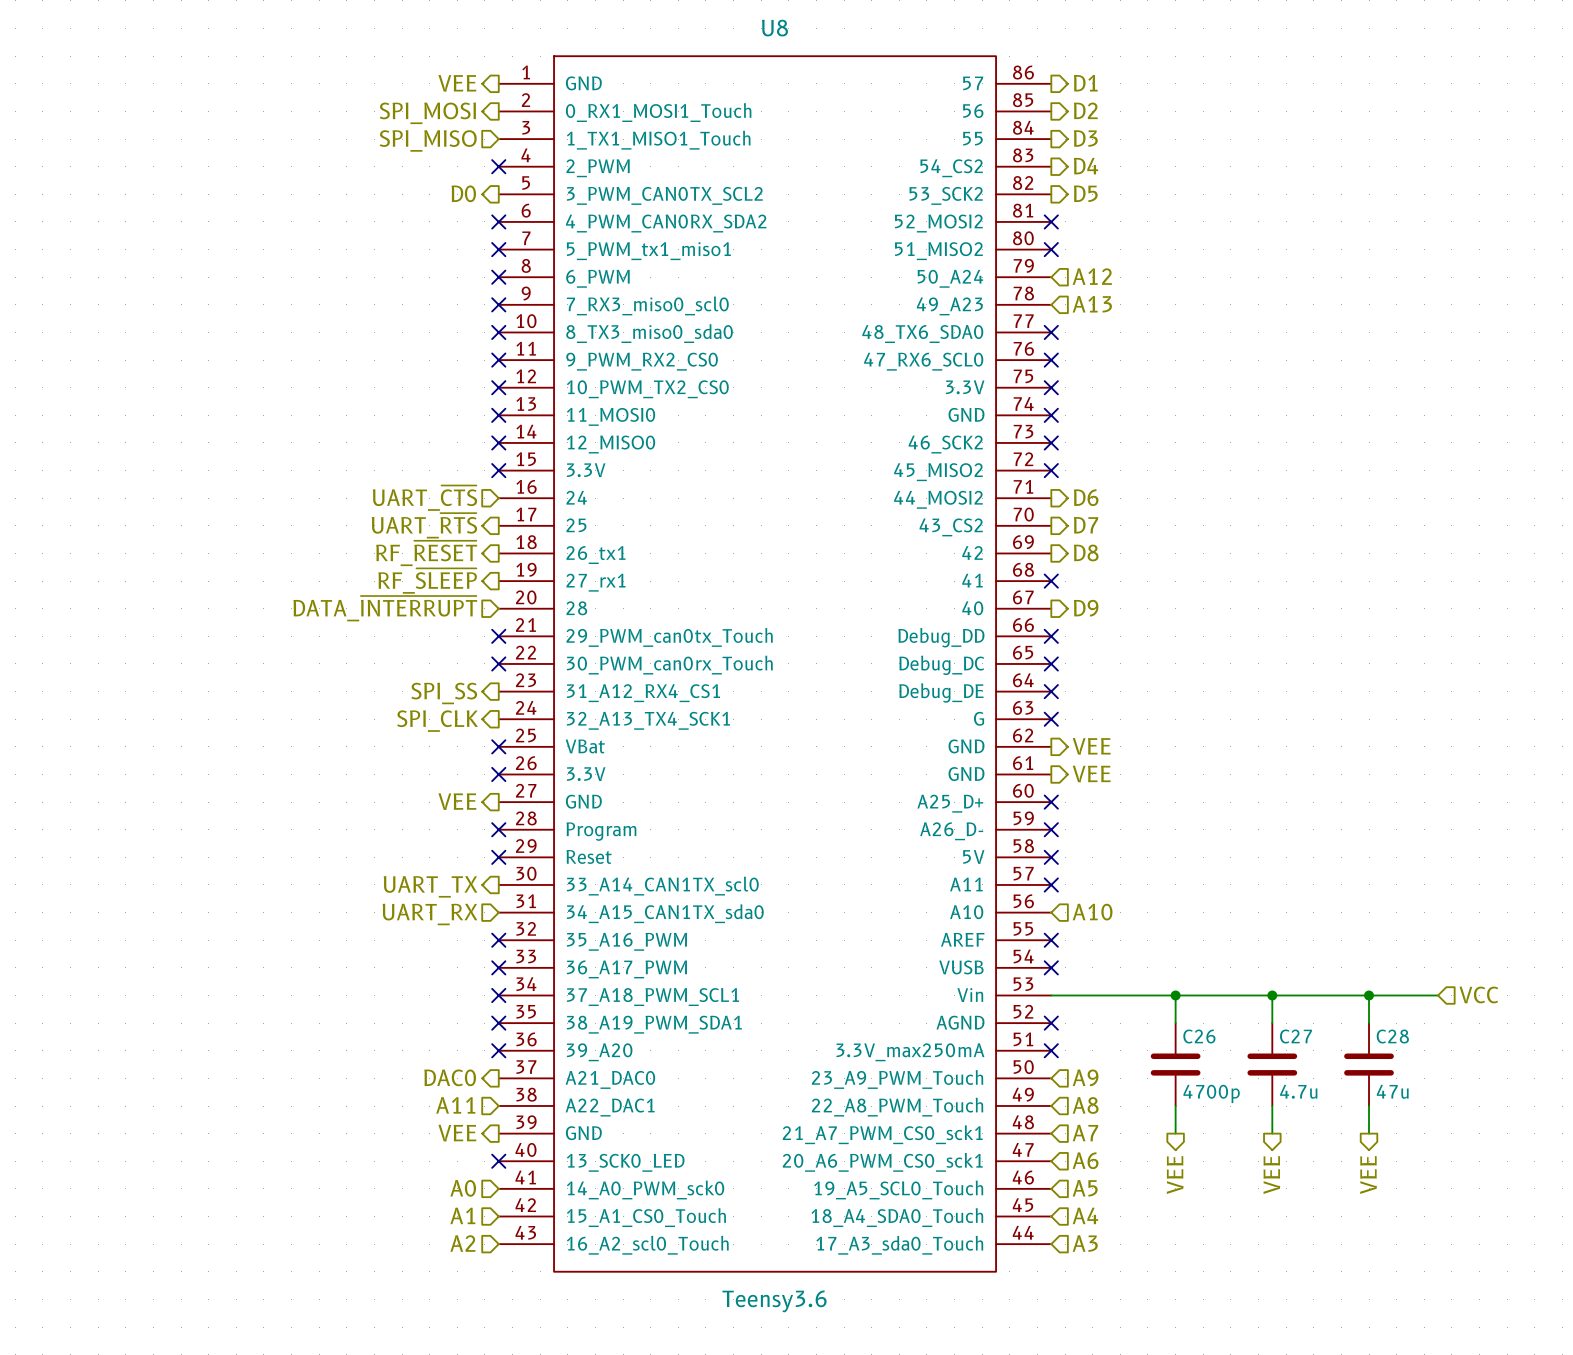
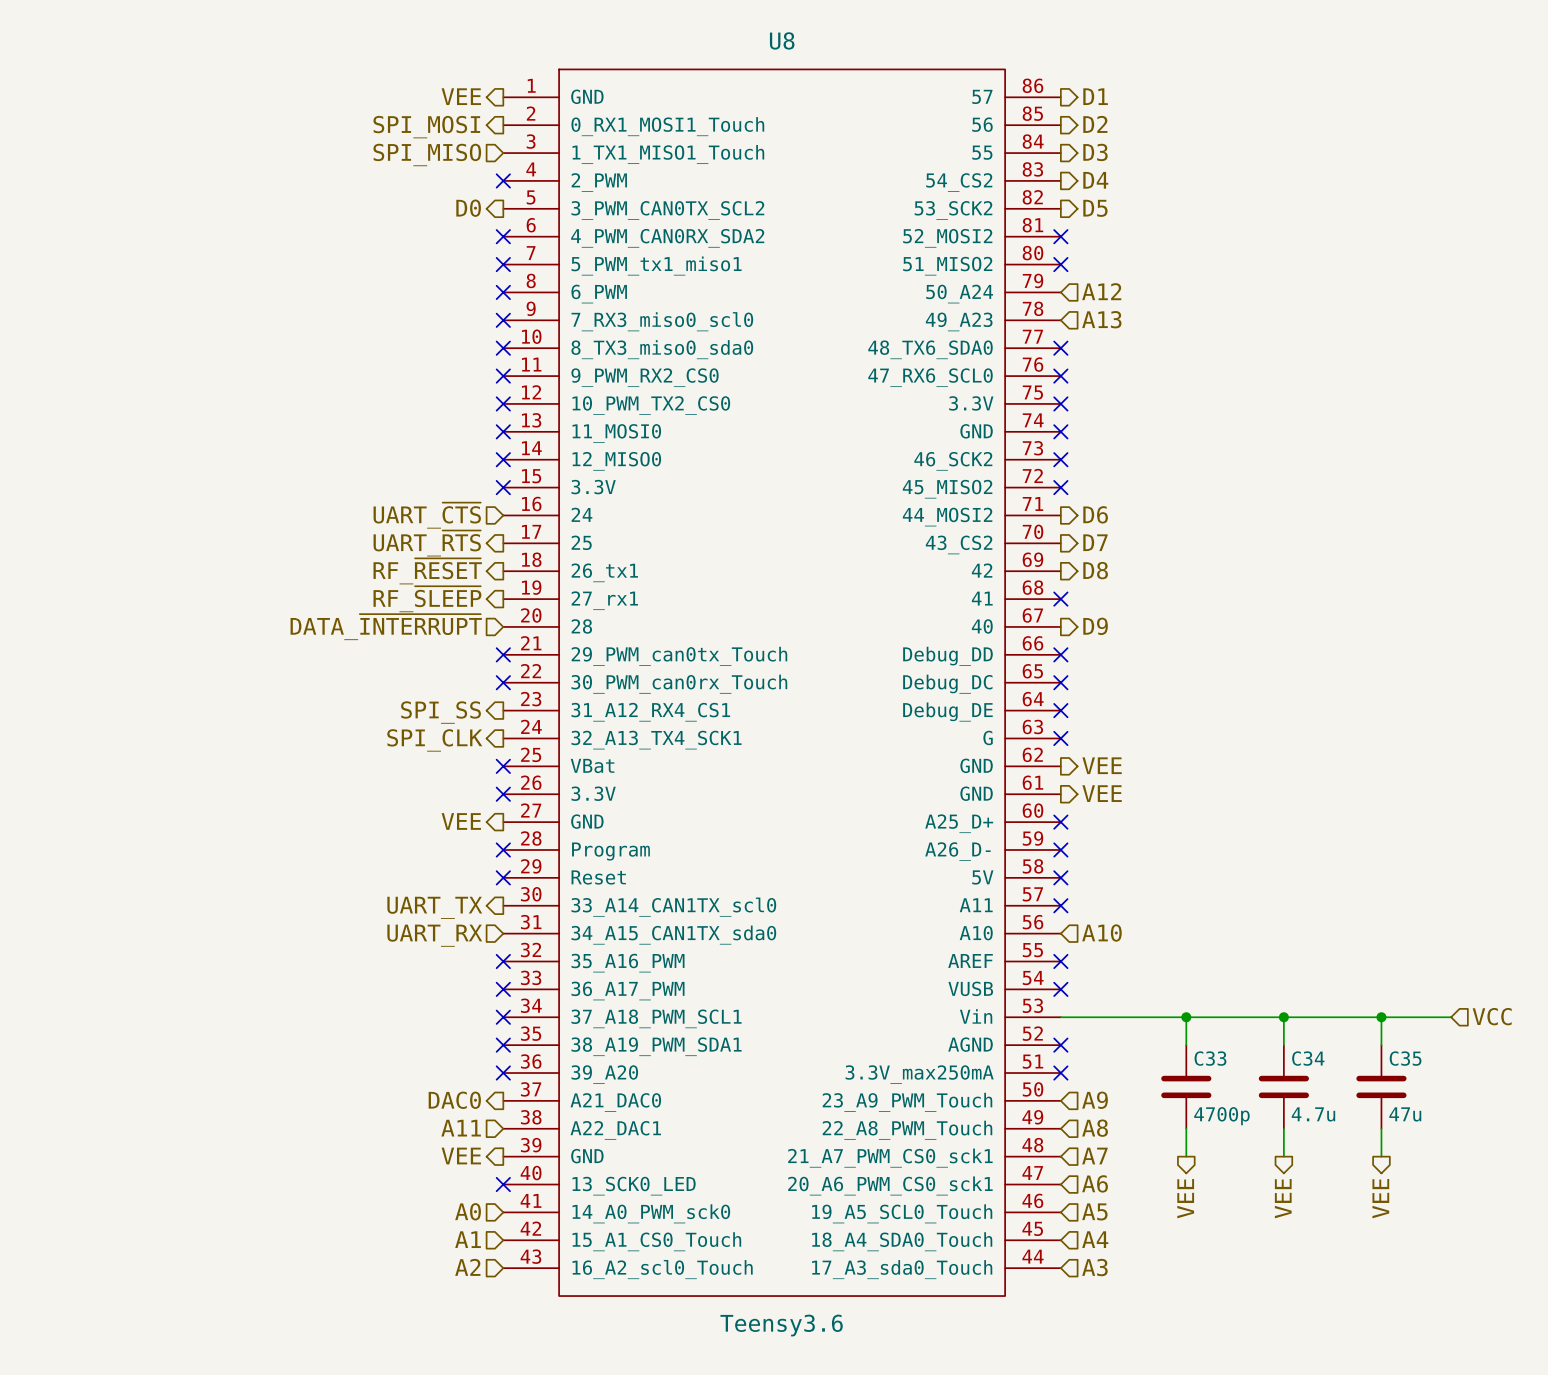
C26 name: C26 (1199, 1036) -> C33 (1210, 1058)
C27 name: C27 (1295, 1036) -> C34 (1308, 1058)
C28 name: C28 (1392, 1036) -> C35 (1405, 1058)

